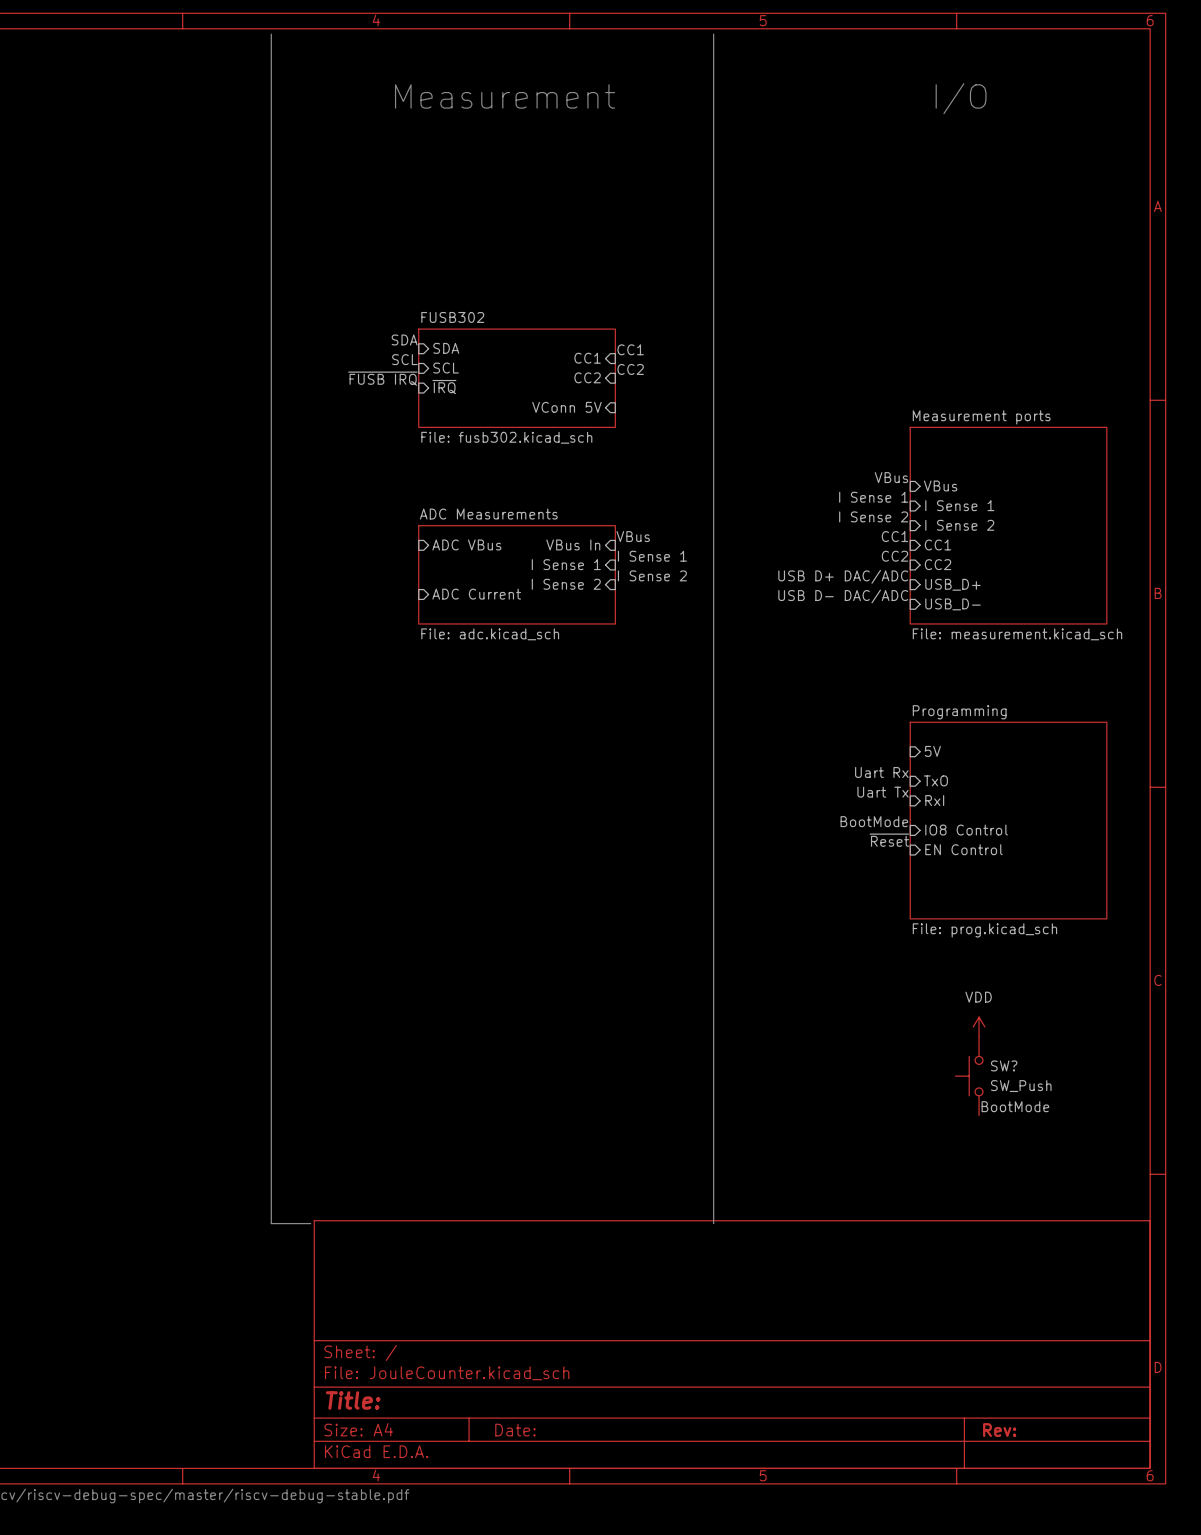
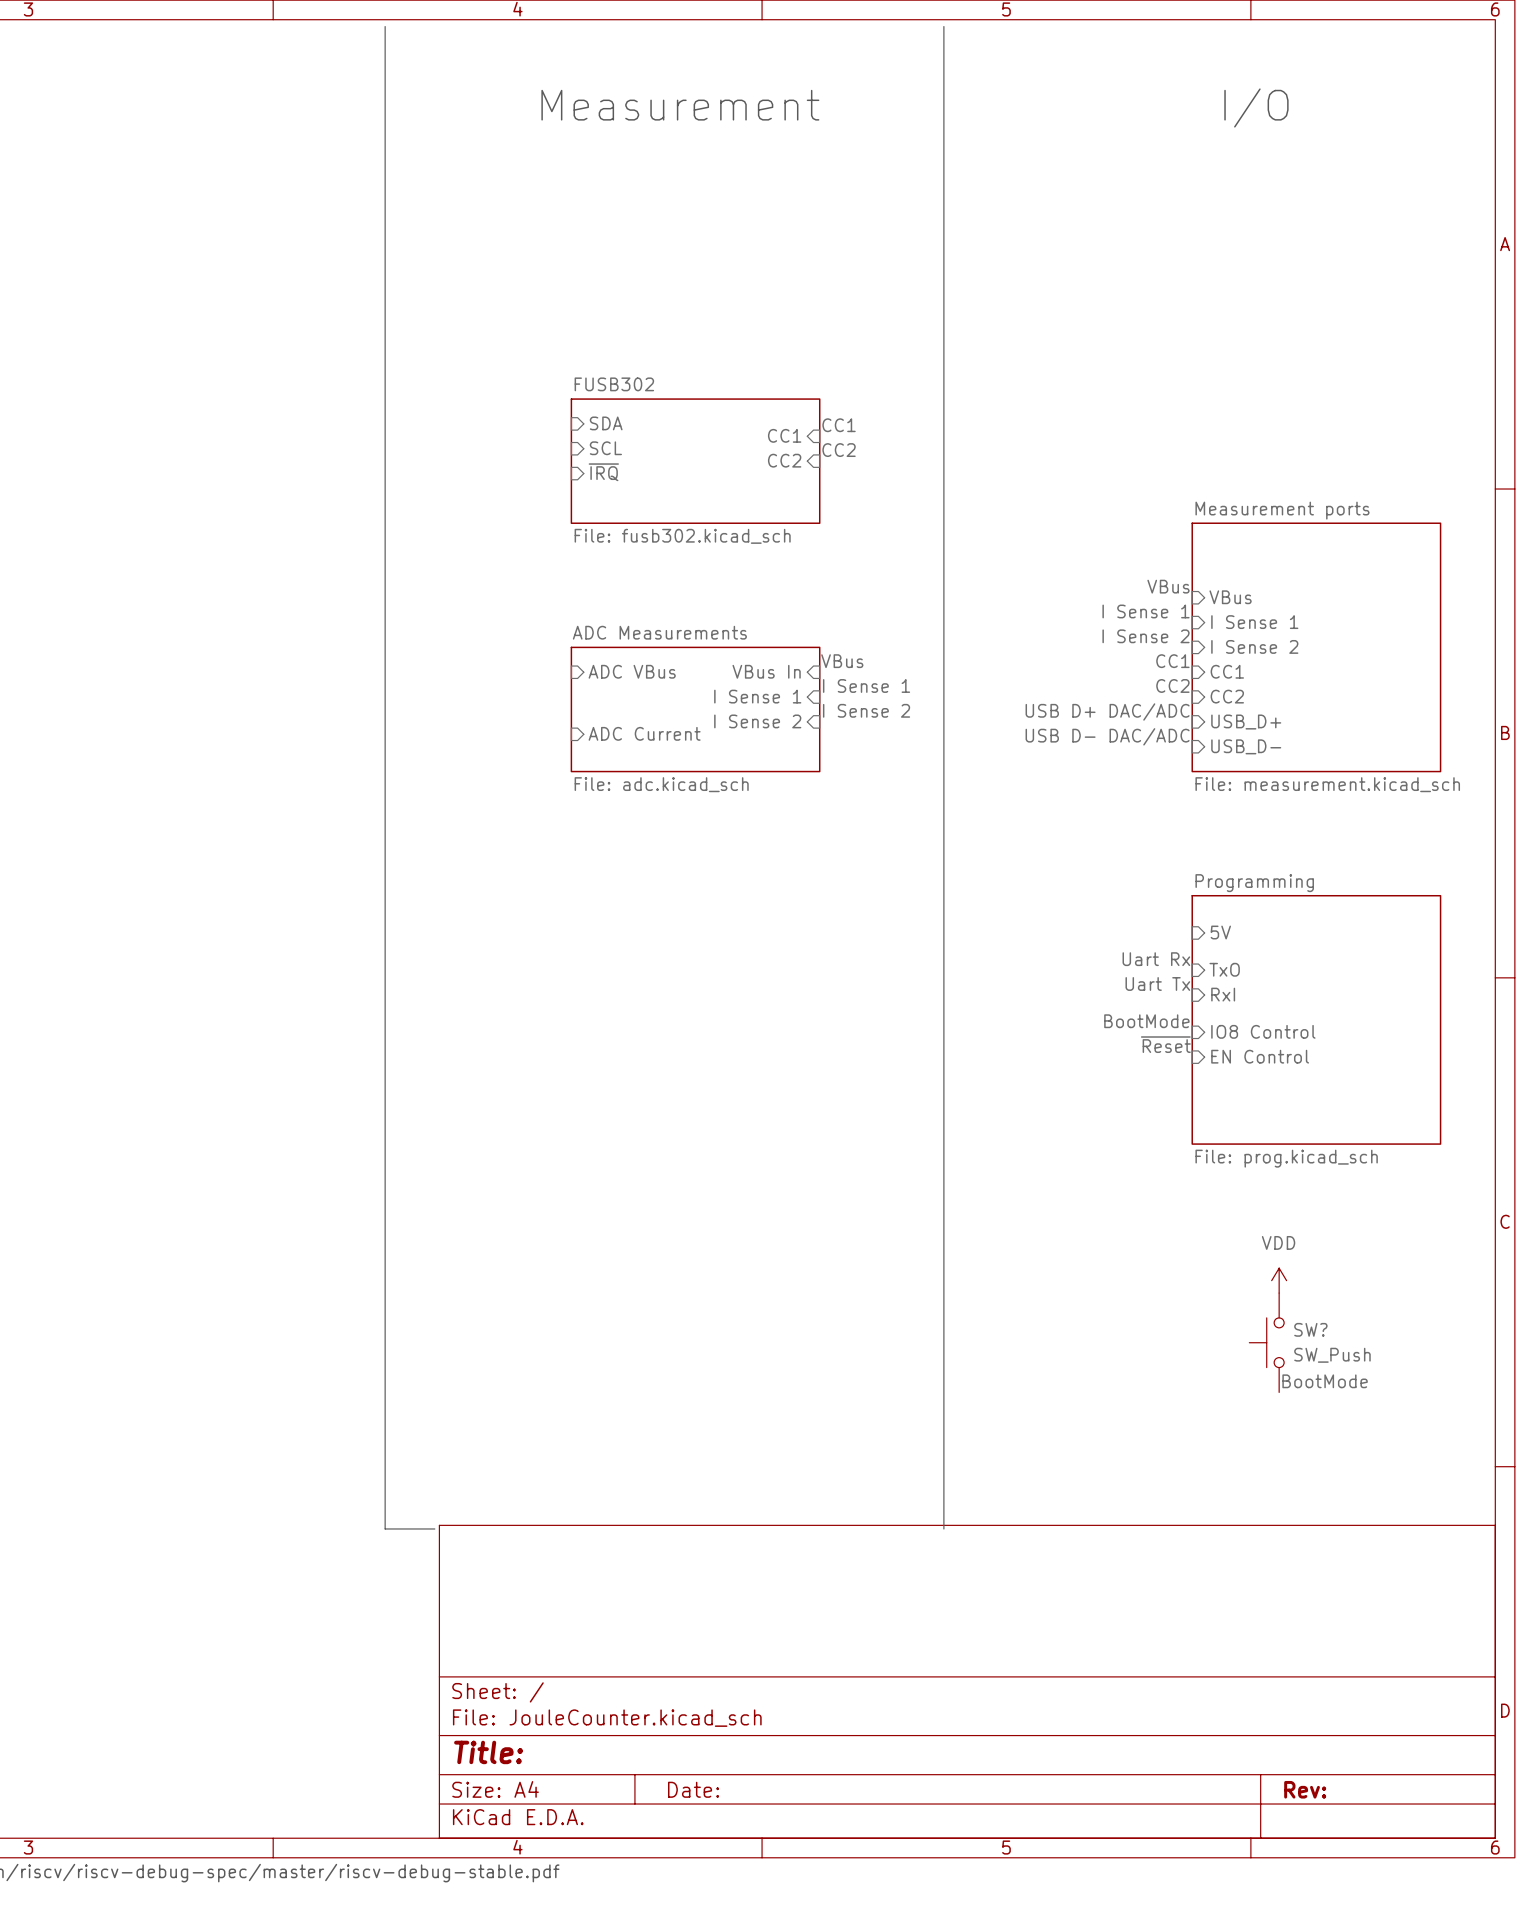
label: SDA (404, 339) -> none
label: SCL (404, 359) -> none
label: ~{FUSB IRQ} (382, 378) -> none
sheet pin: VConn 5V (566, 407) -> none

